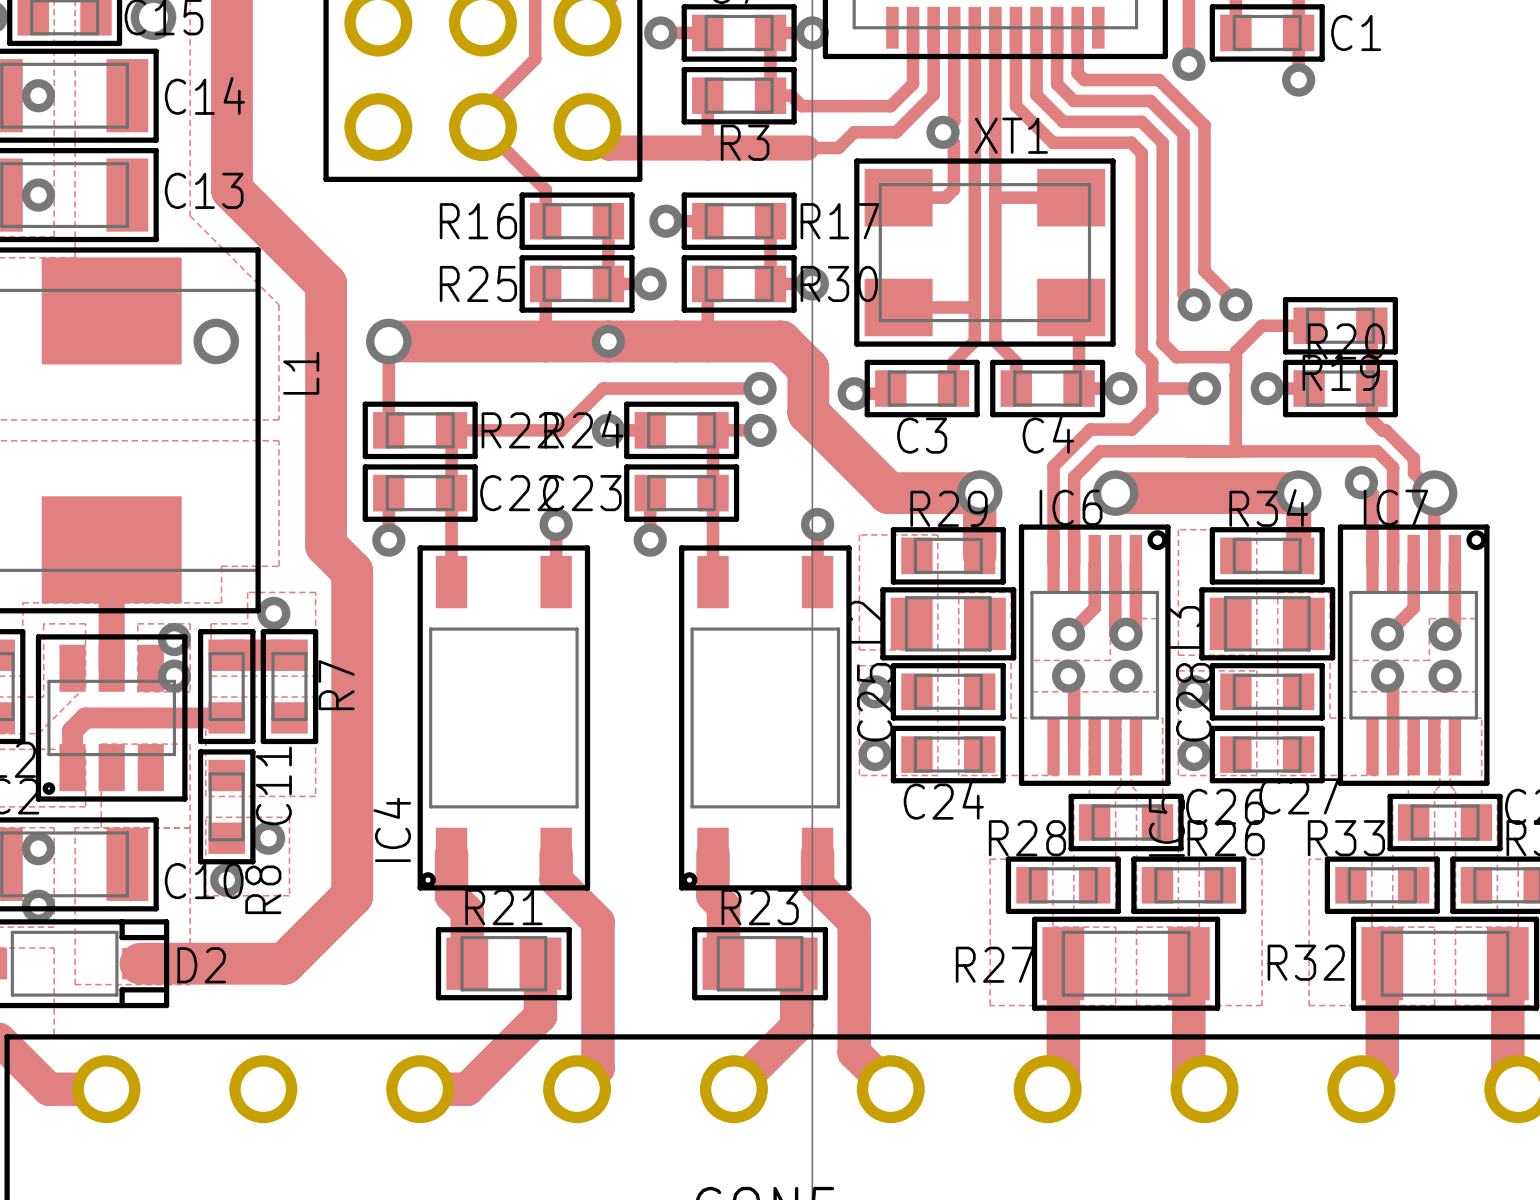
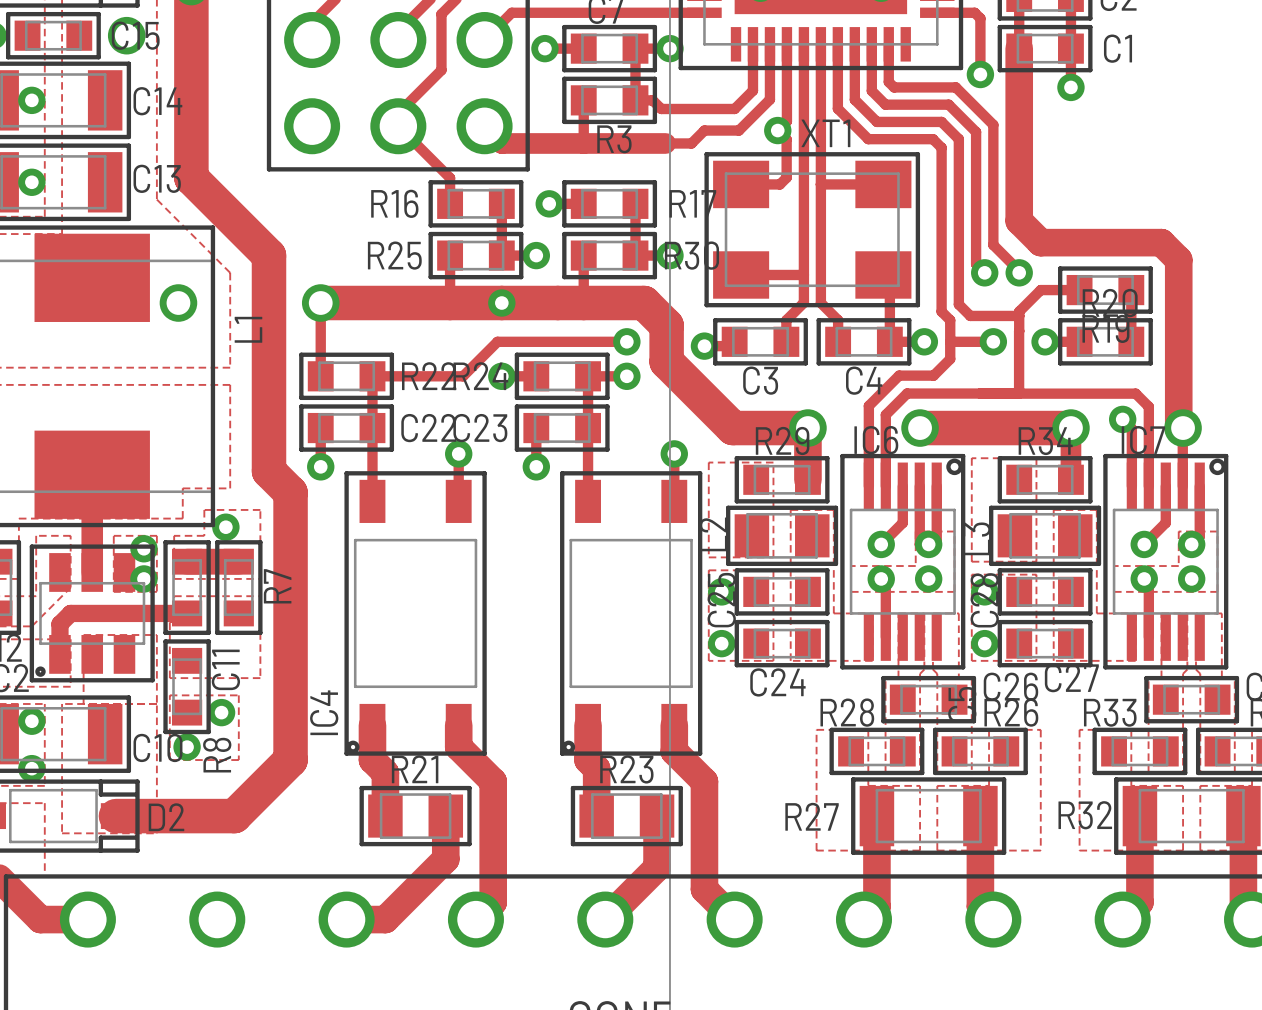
track: (1371, 388) (1371, 419) (1382, 430) (1385, 430) (1414, 458) (1414, 473) (1434, 493) -> (1019, 48) (1019, 221) (1040, 242) (1161, 242) (1178, 259) (1178, 423) (1183, 428)

